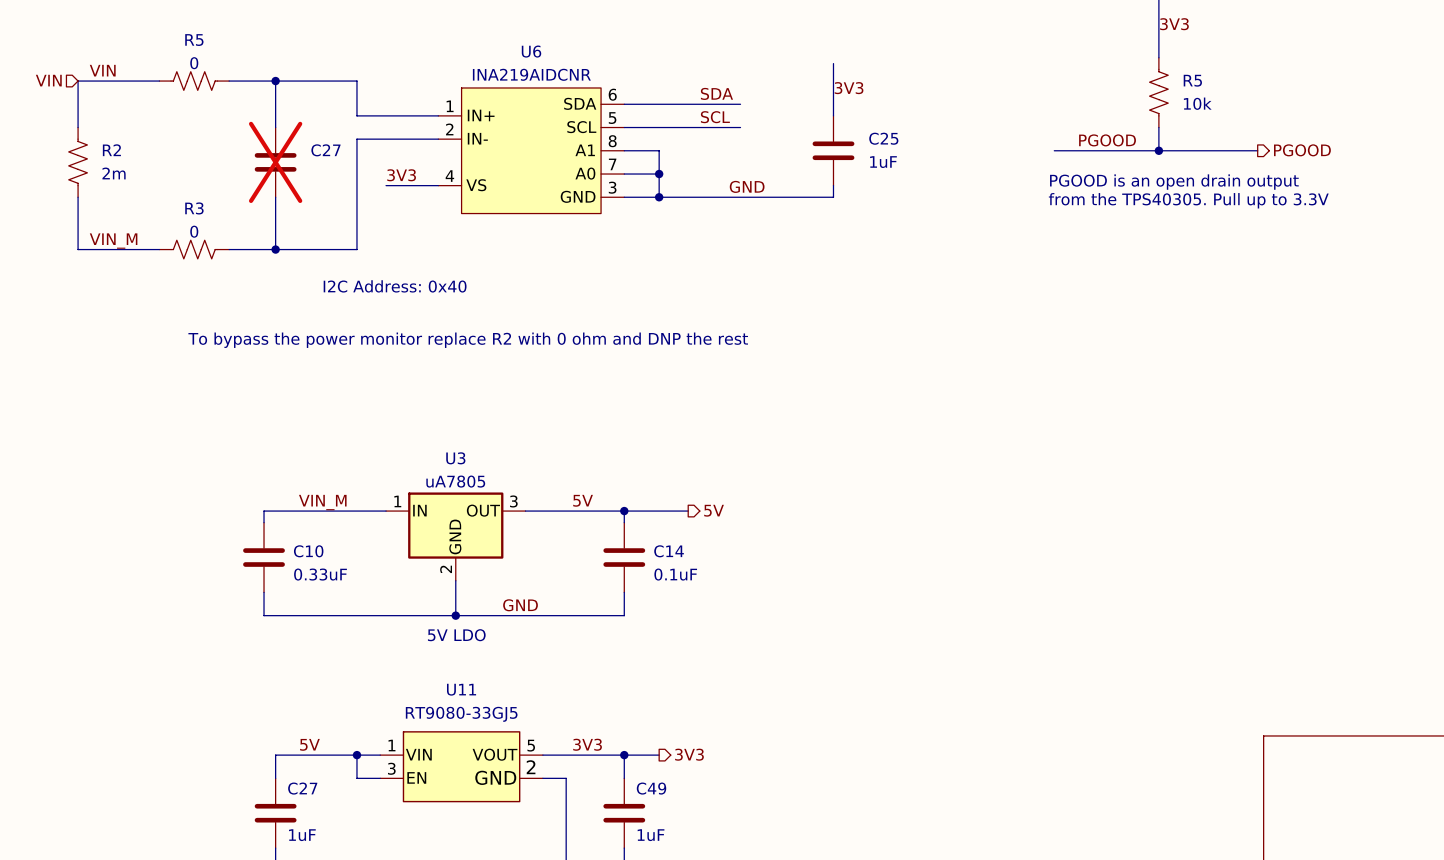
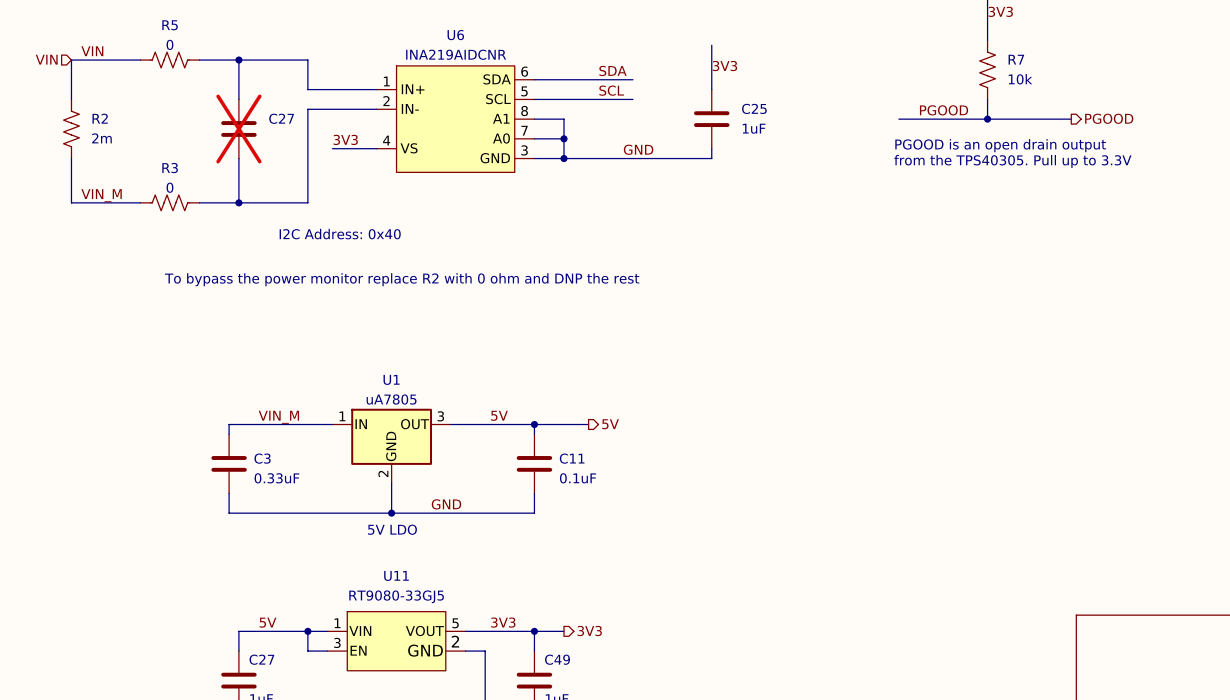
R5 name: R5 (1192, 80) -> R7 (1016, 59)
U3 name: U3 (455, 458) -> U1 (391, 379)
C10 name: C10 (308, 551) -> C3 (262, 458)
C14 name: C14 (669, 551) -> C11 (572, 458)

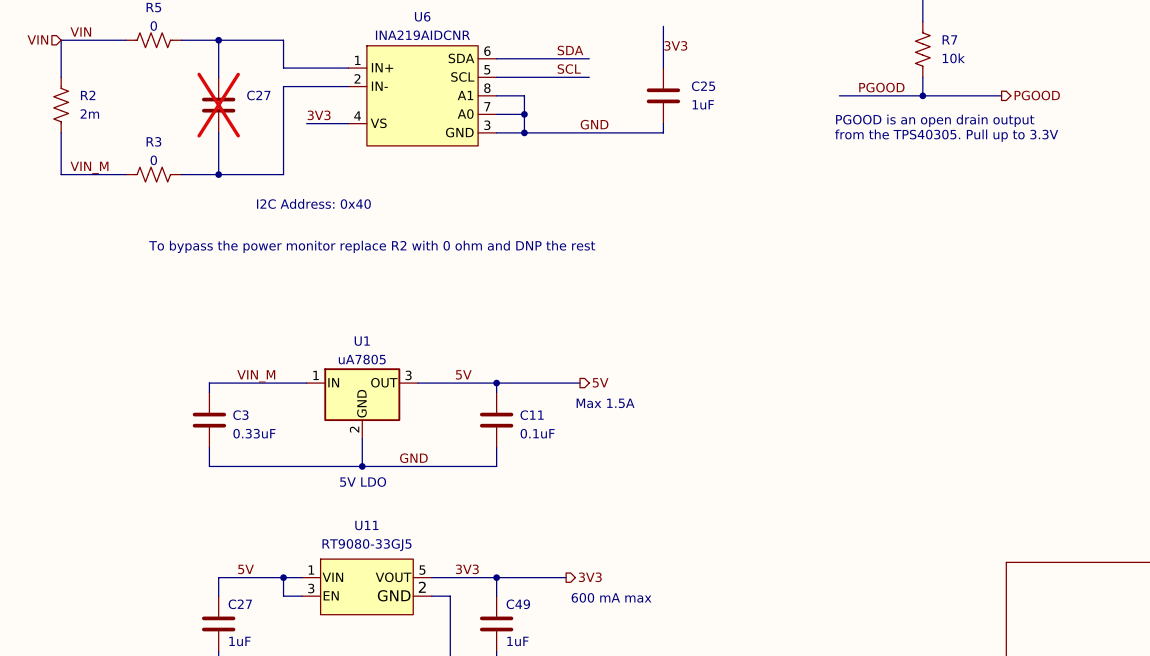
wire: none -> (547, 383) (580, 383)
hierarchical label position: 5V (610, 424) -> 5V (600, 382)
text: none -> Max 1.5A (605, 403)
wire: none -> (524, 577) (566, 577)
hierarchical label position: 3V3 (589, 631) -> 3V3 (590, 577)
text: none -> 600 mA max (611, 597)

